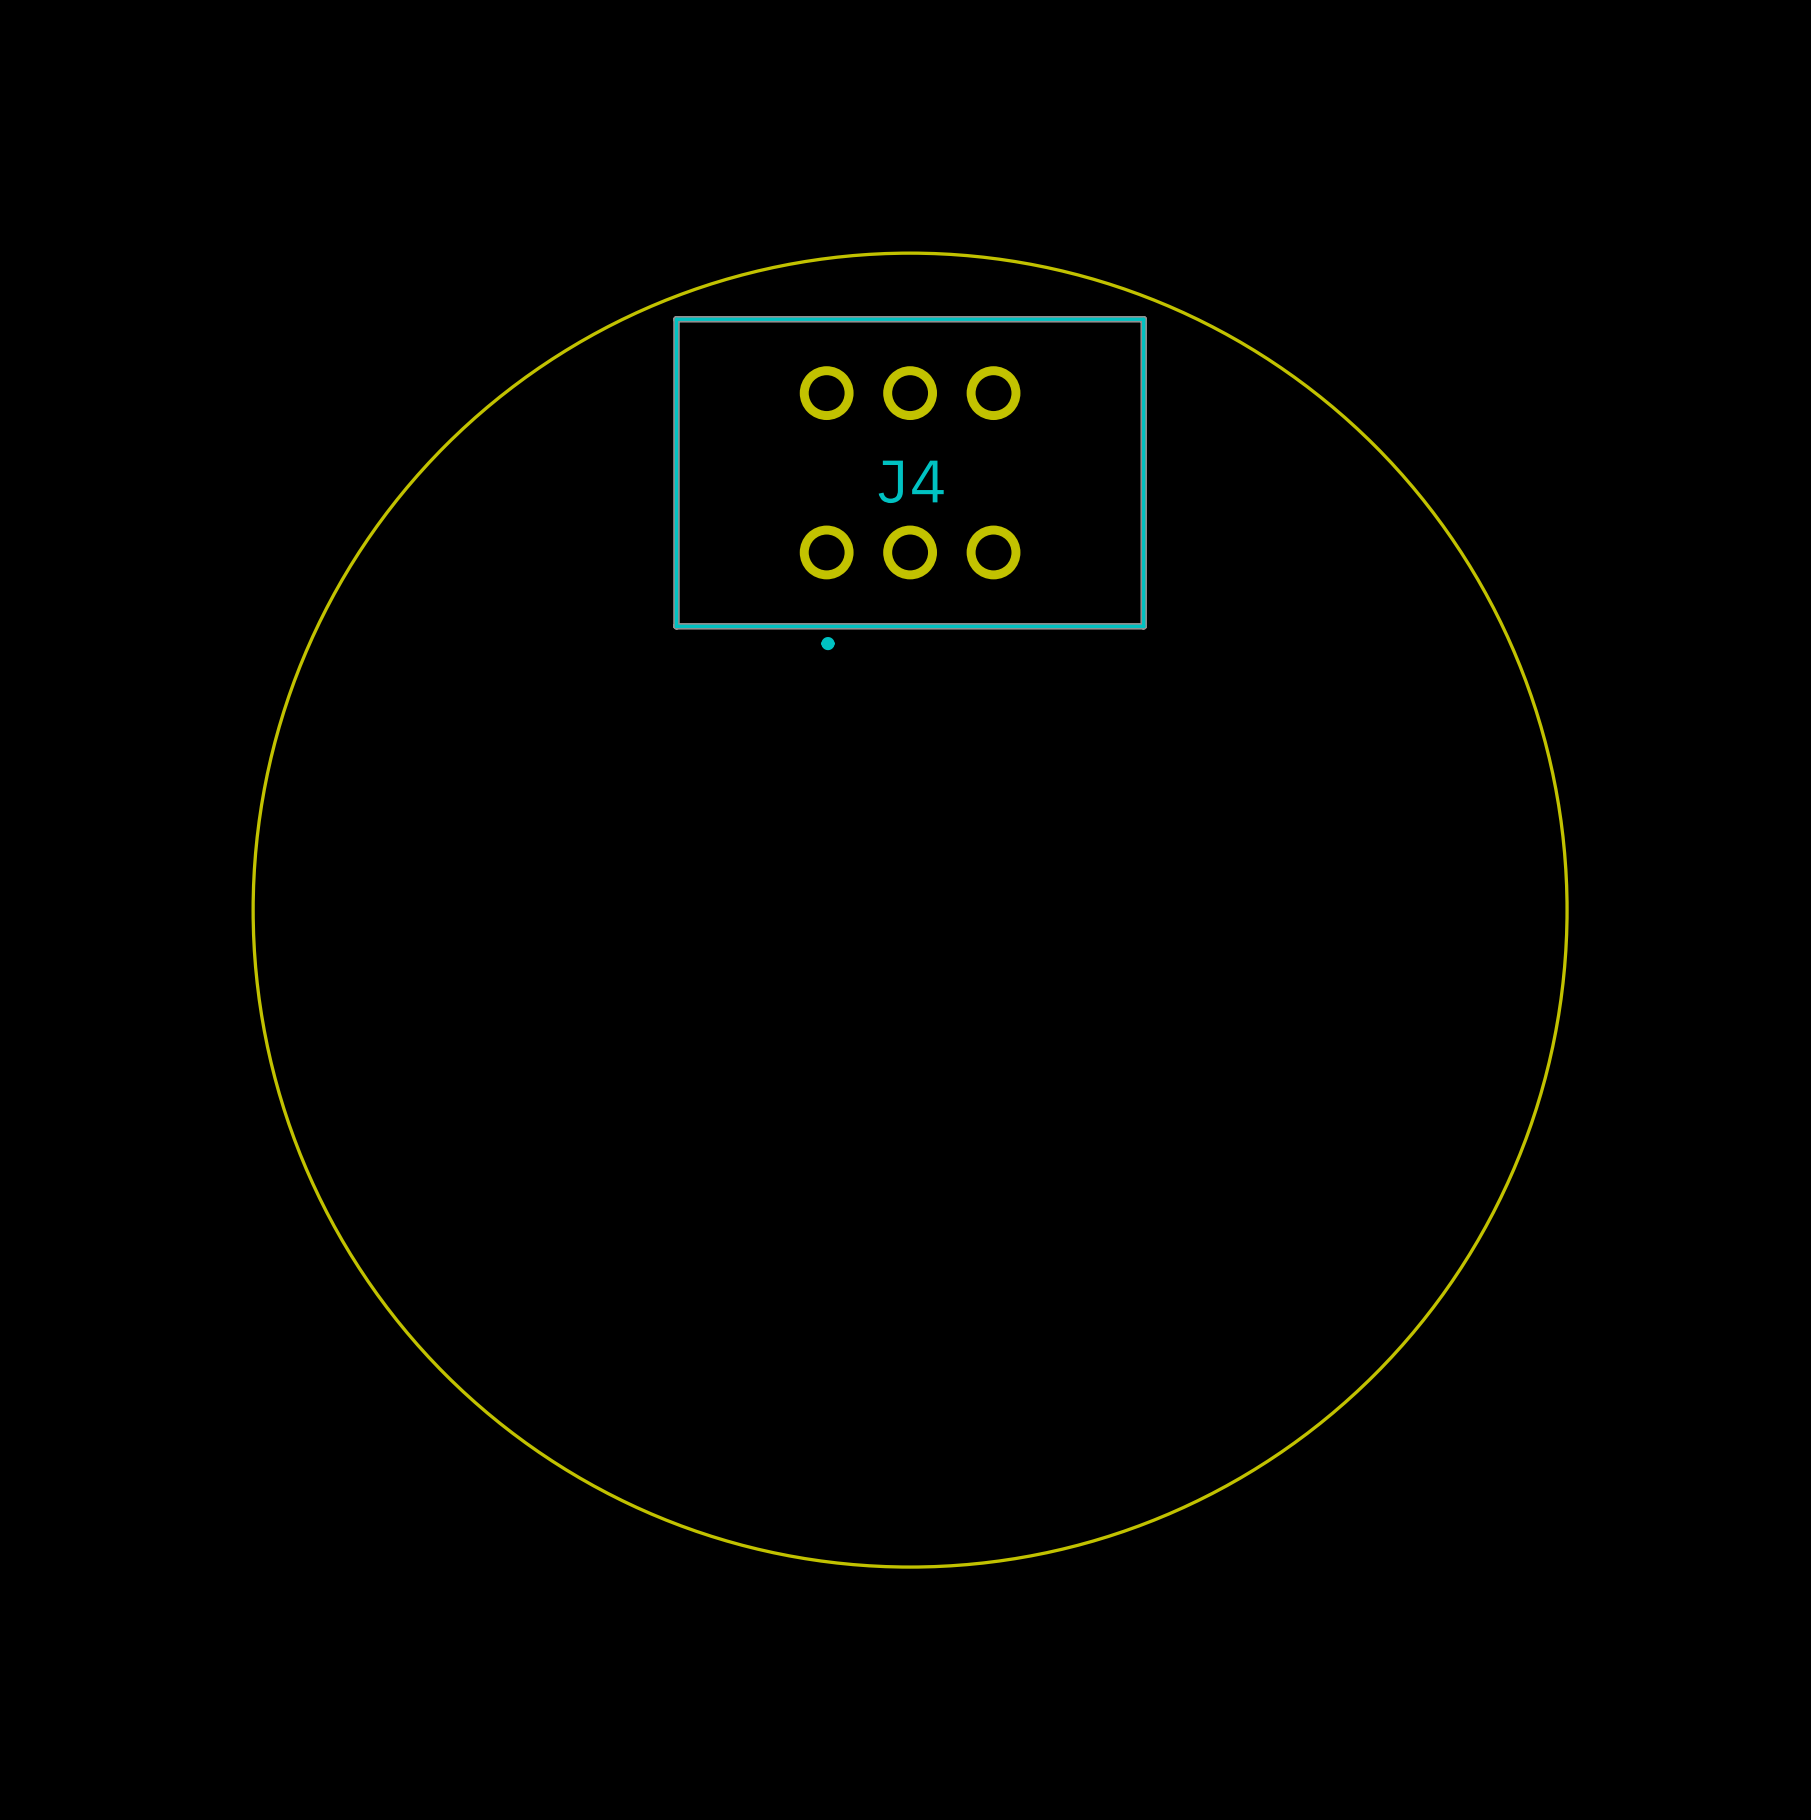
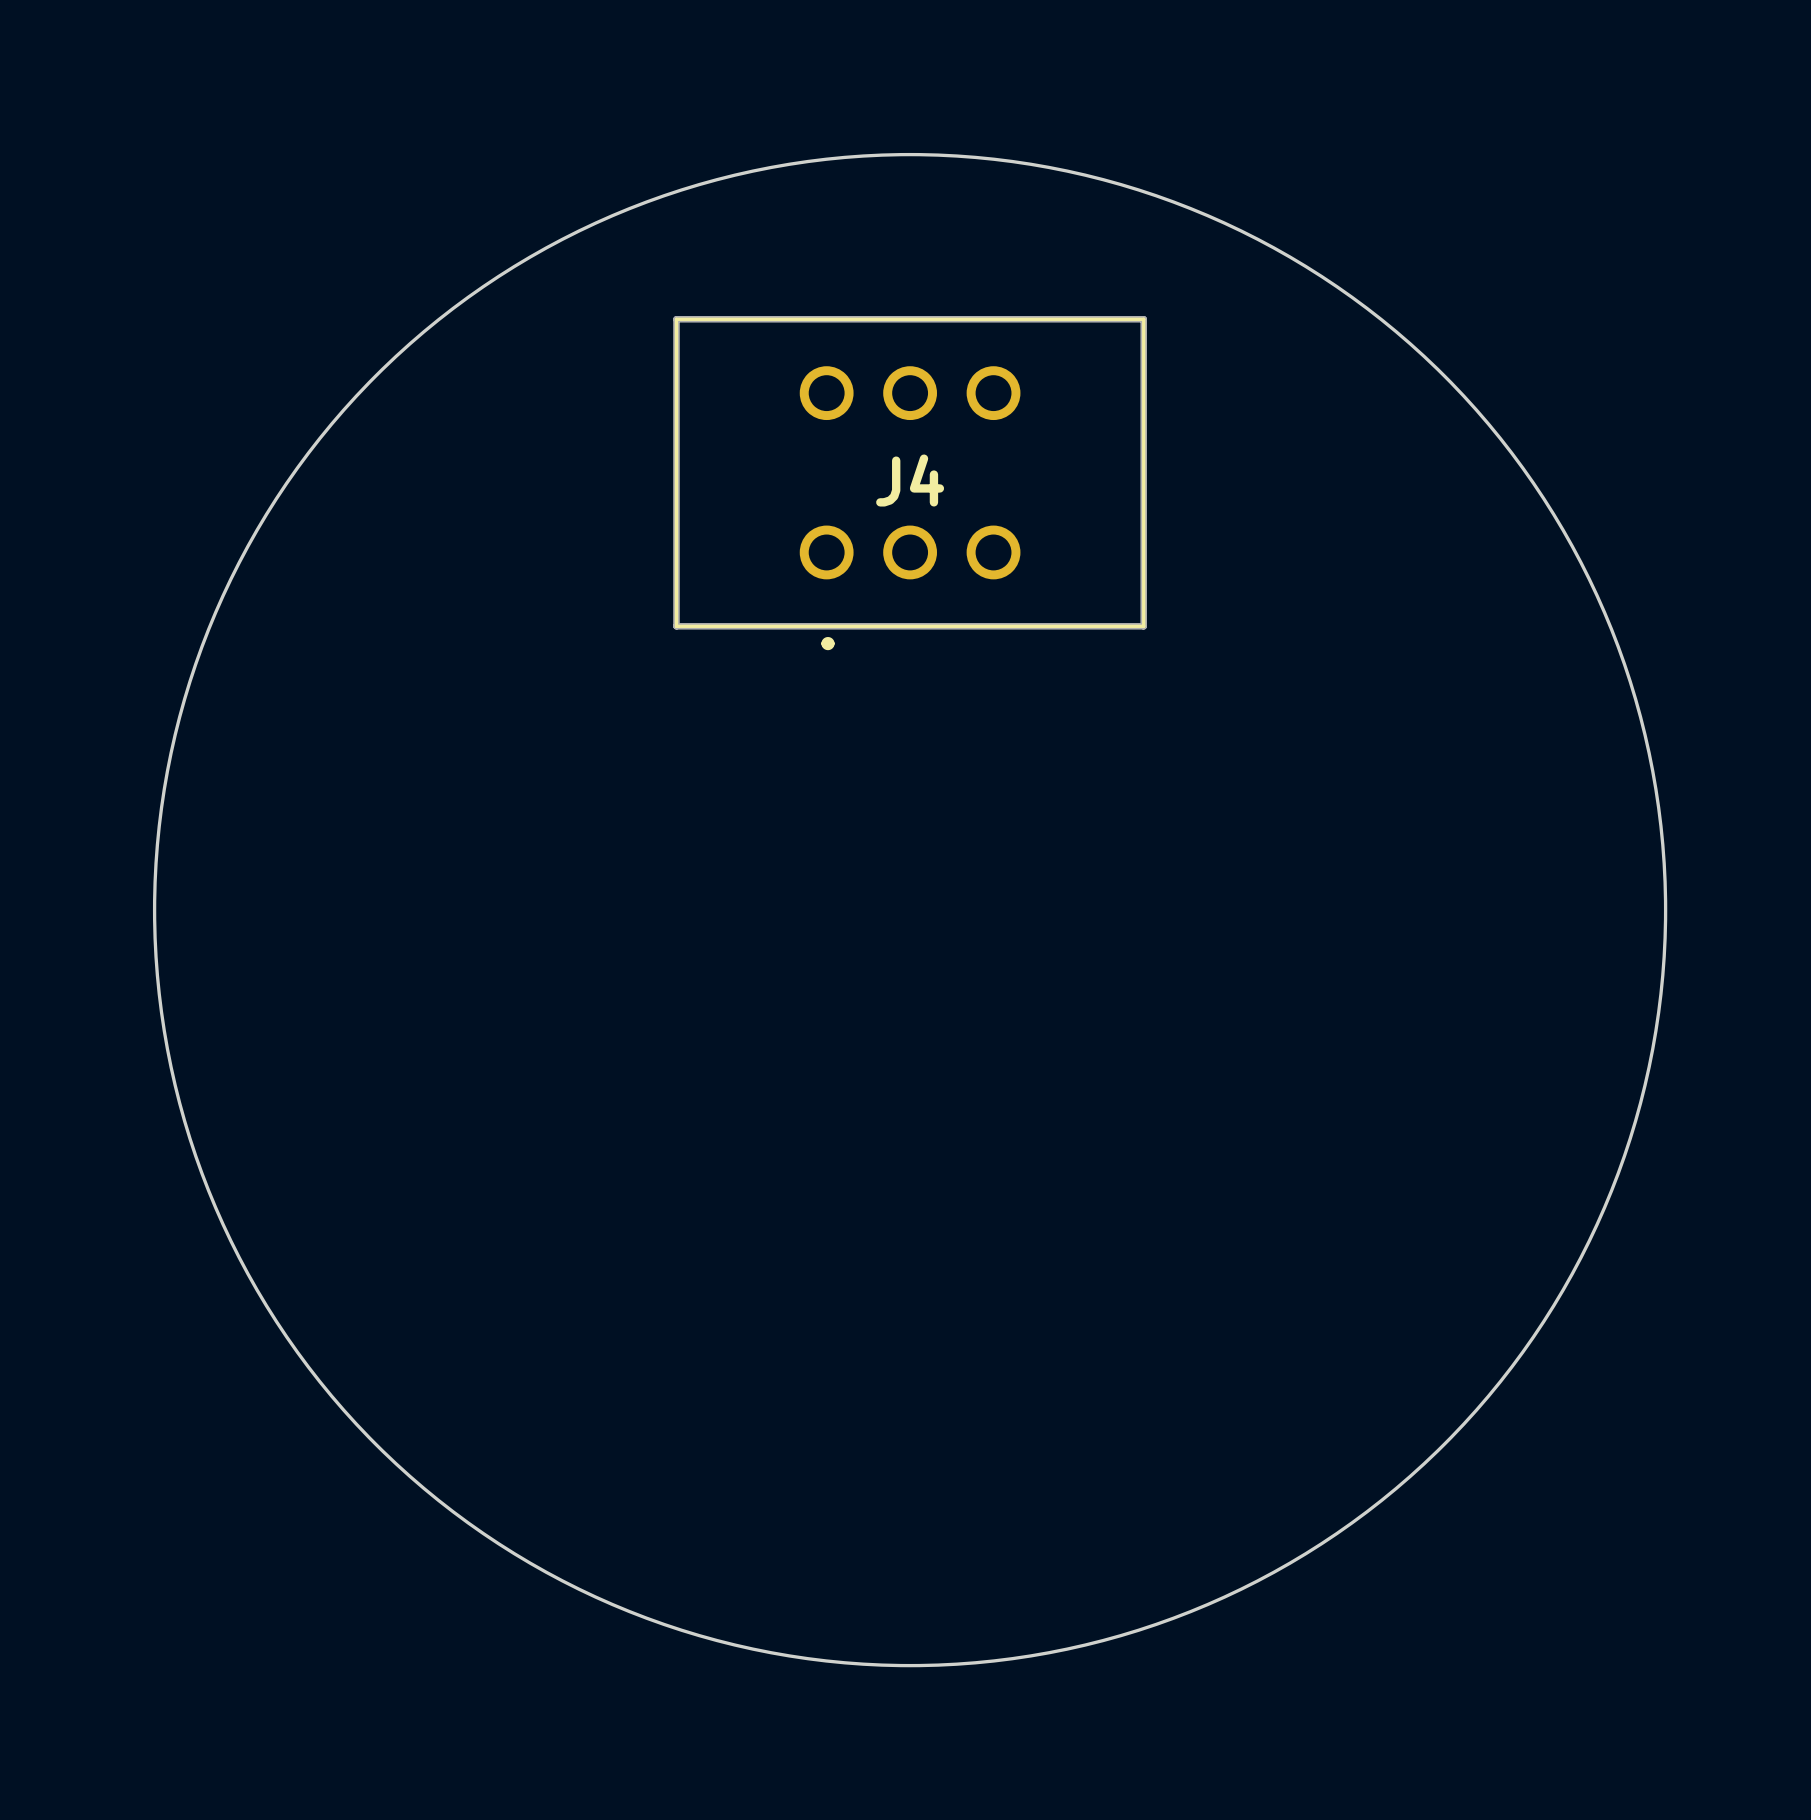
round board edge size: [251, 251, 1569, 1569] -> [152, 152, 1668, 1668]

